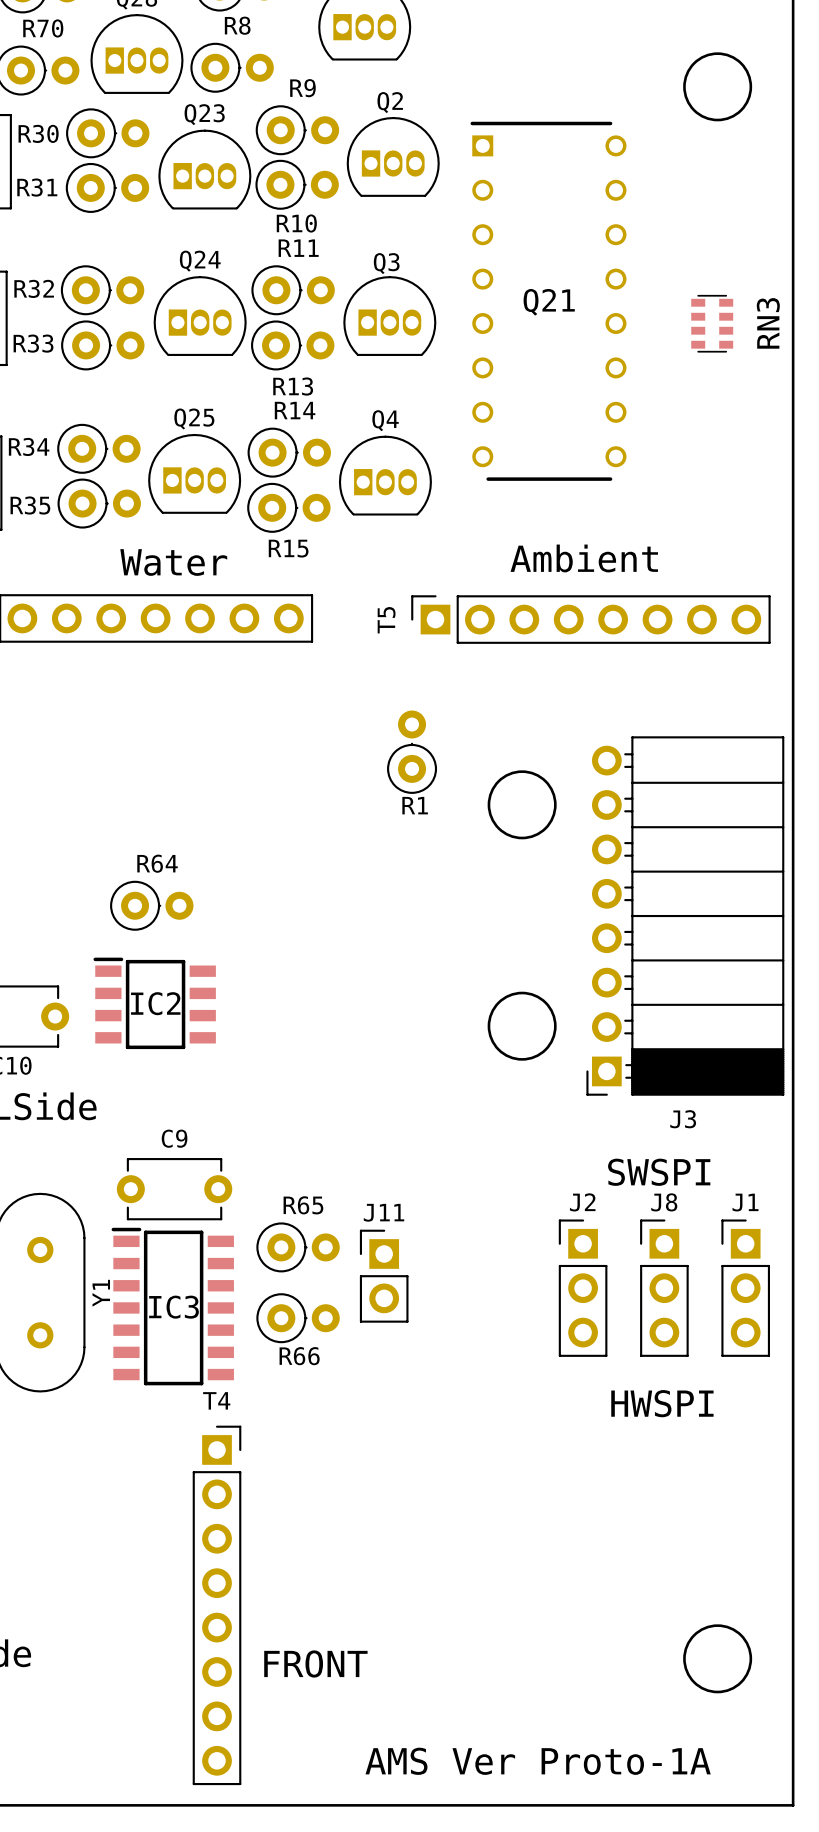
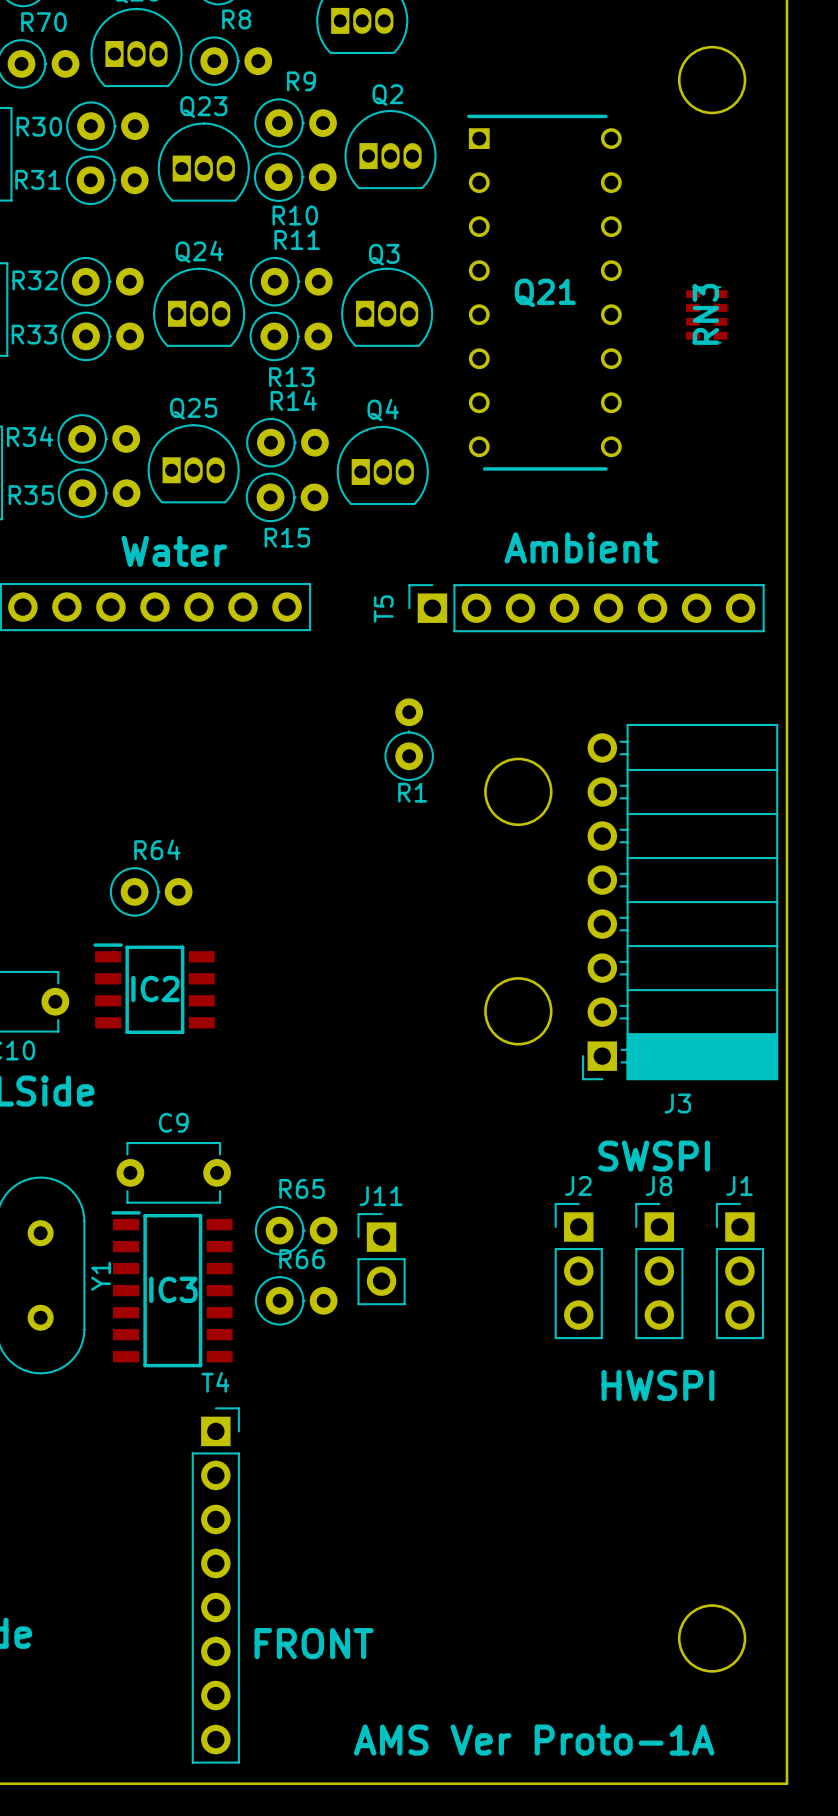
RN3 name position: RN3 (768, 323) -> RN3 (705, 314)
R66 name position: R66 (299, 1356) -> R66 (302, 1259)

